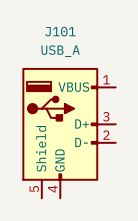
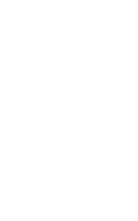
J101: USB_A (69, 133) -> none

